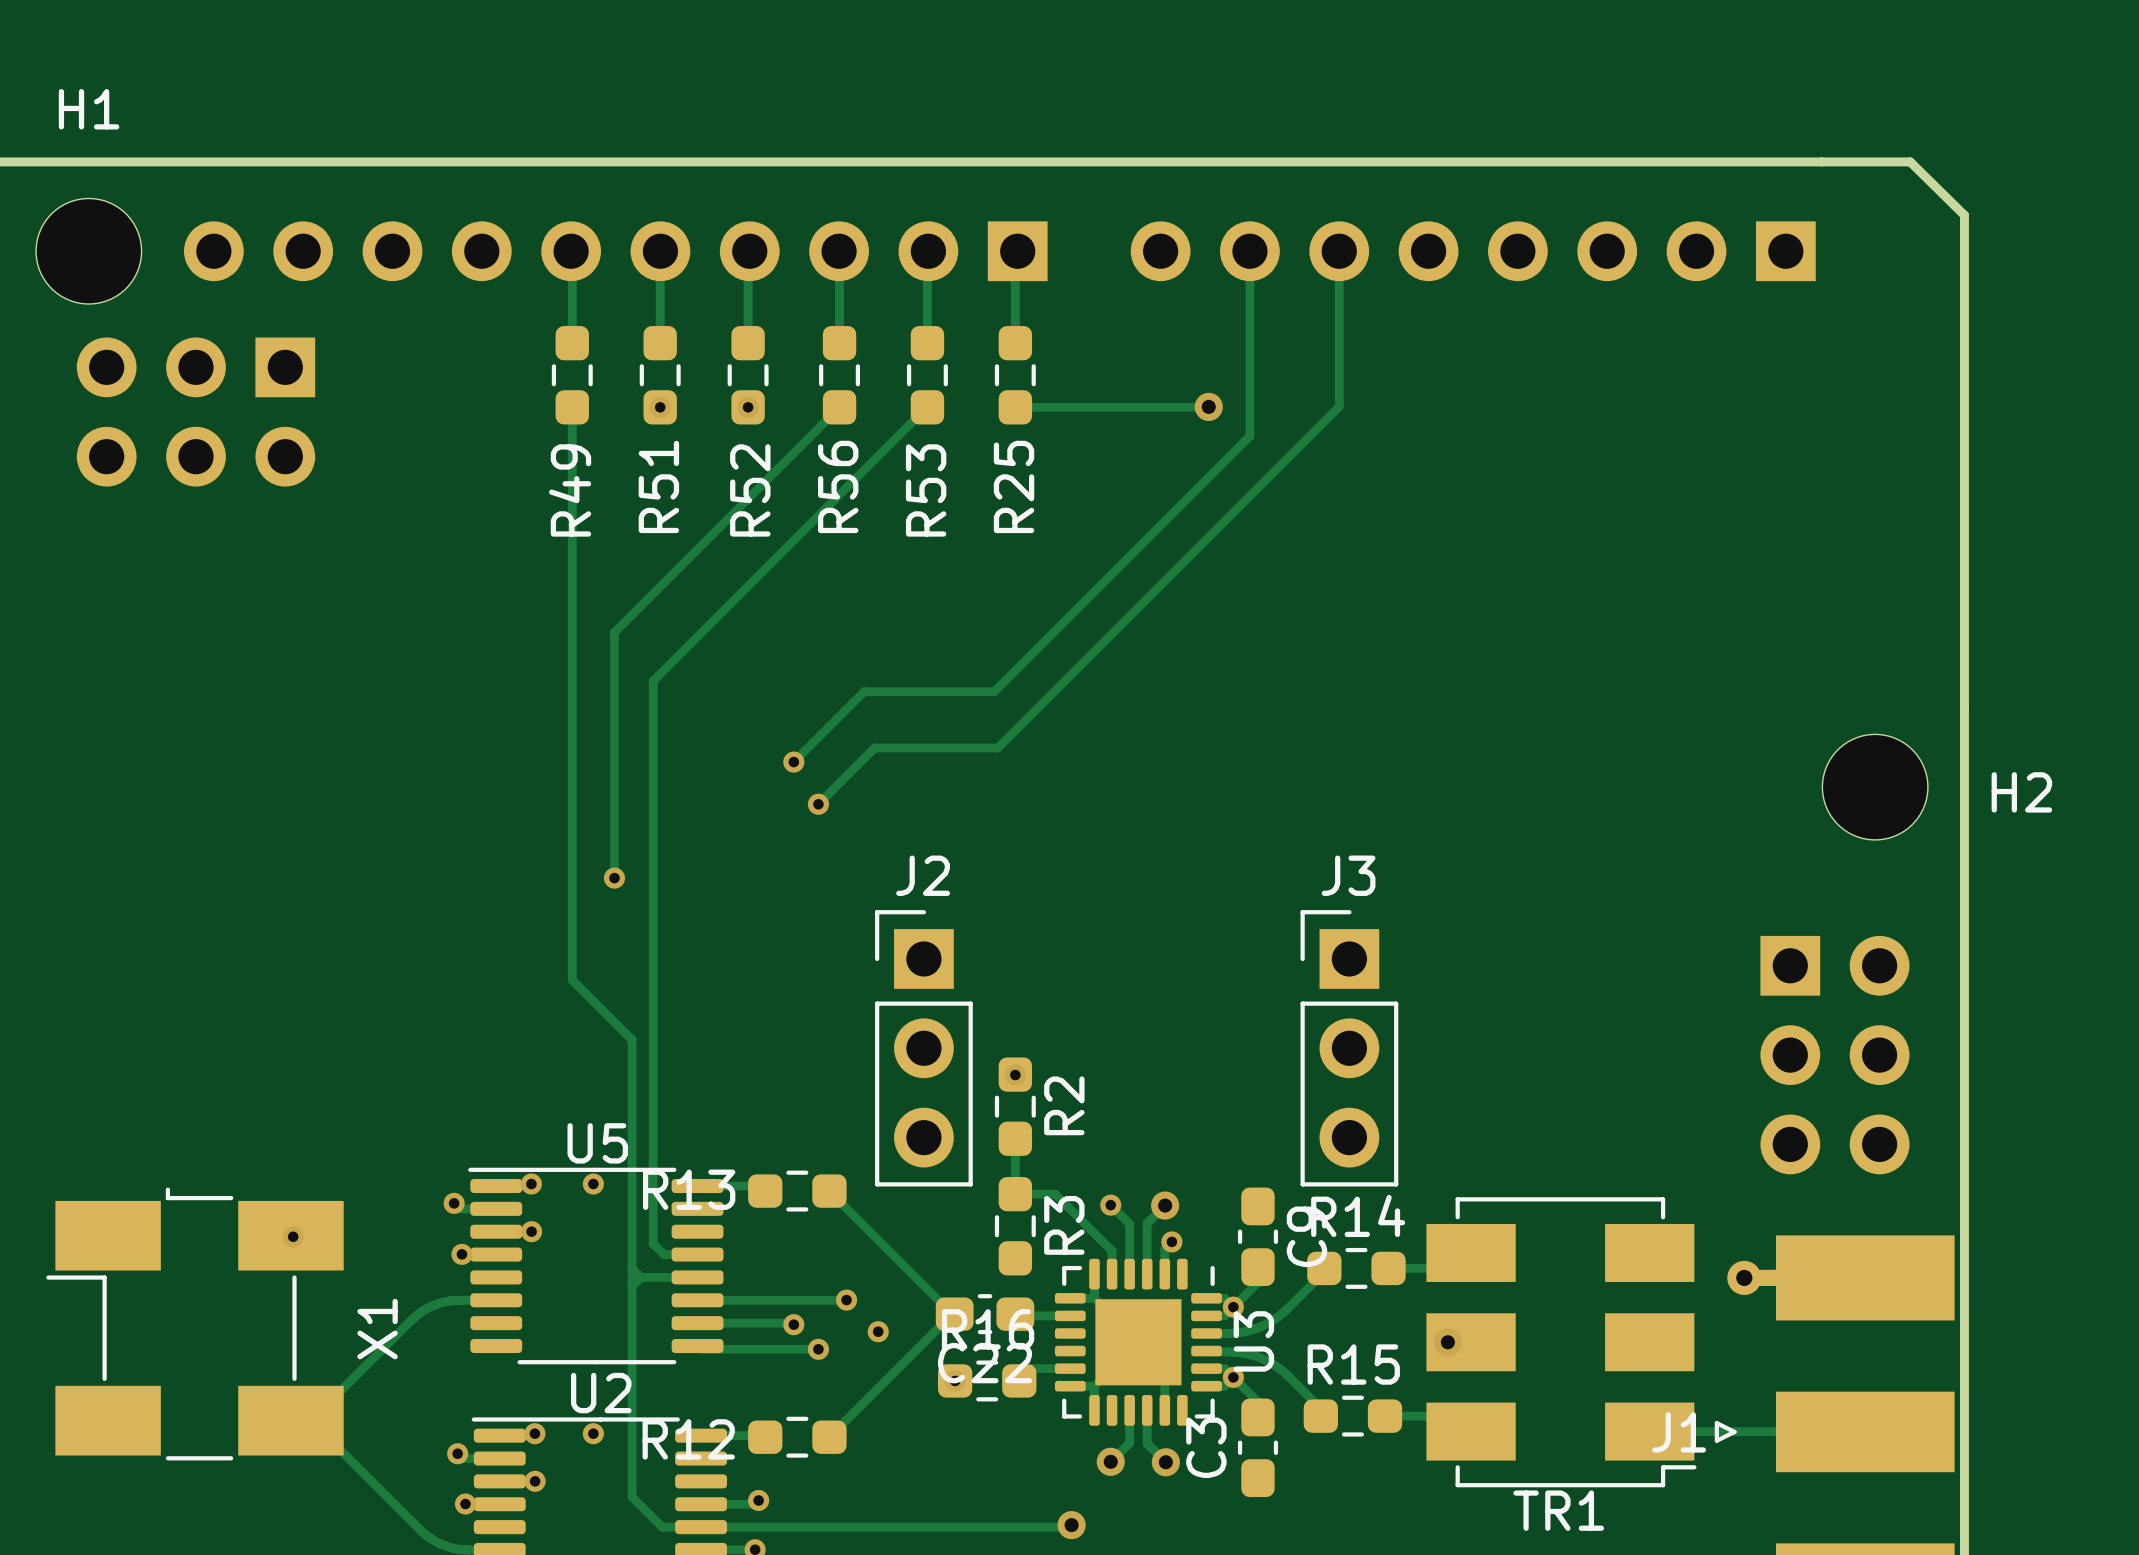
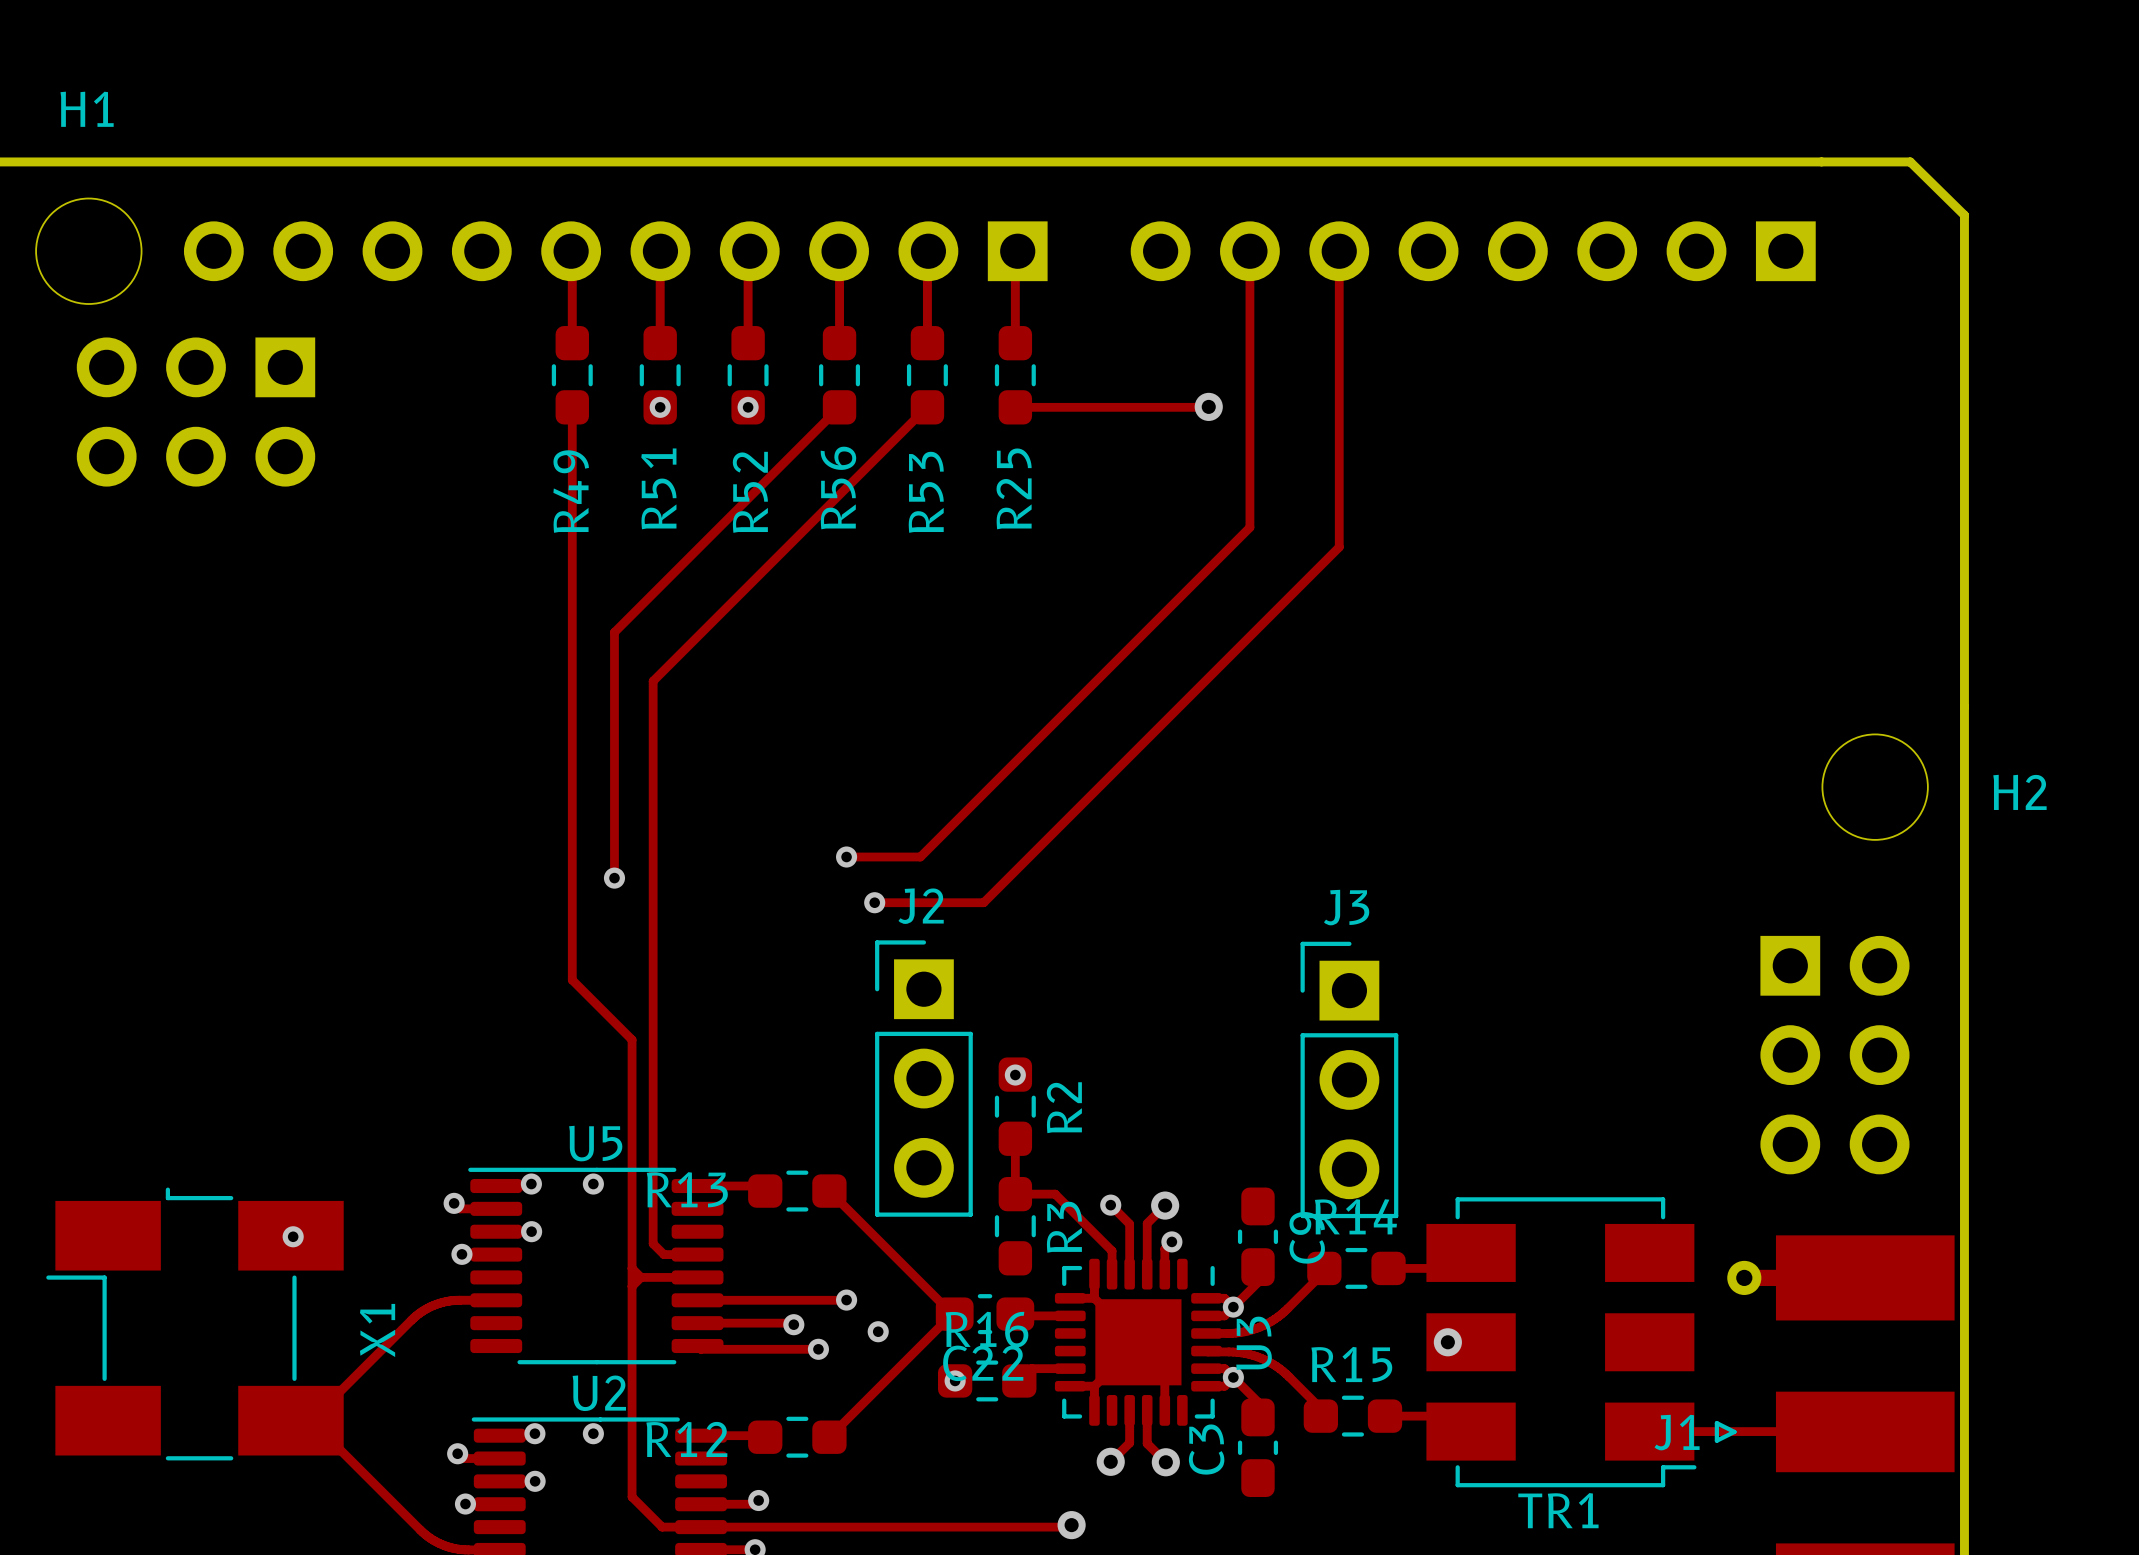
track: (1339, 406) (997, 747) (874, 747) (818, 804) -> (1339, 406) (1339, 547) (983, 902) (874, 902)
track: (1249, 436) (994, 691) (864, 691) (793, 762) -> (1249, 436) (1249, 527) (920, 857) (846, 857)
via: (793, 762) -> none
via: (818, 804) -> none
via: none -> (846, 857)
via: none -> (874, 902)
J2 position: (923, 1048) -> (923, 1078)
J3 position: (1349, 1048) -> (1349, 1079)

